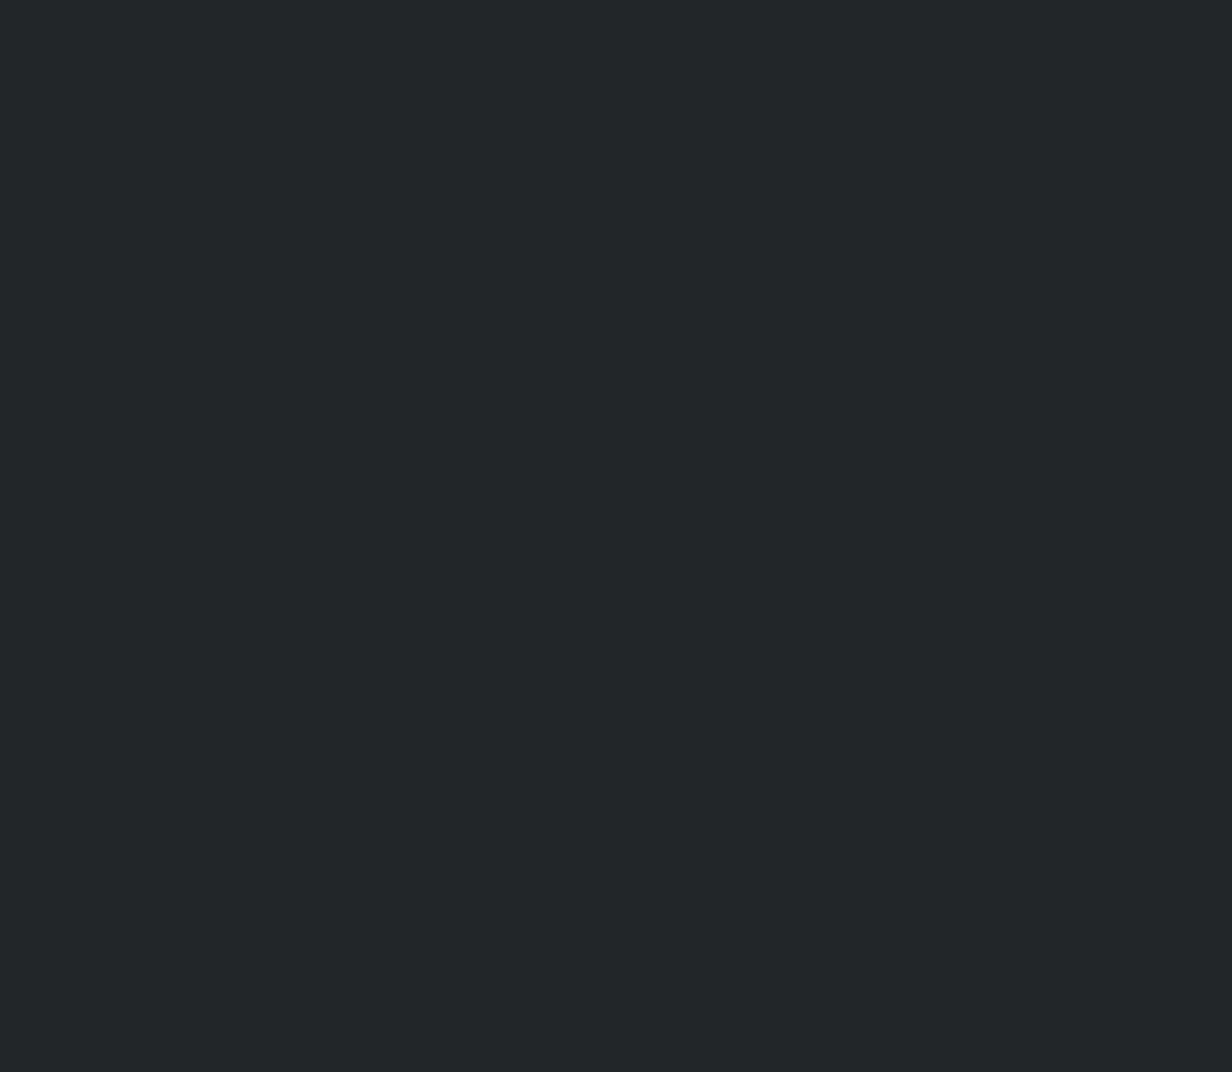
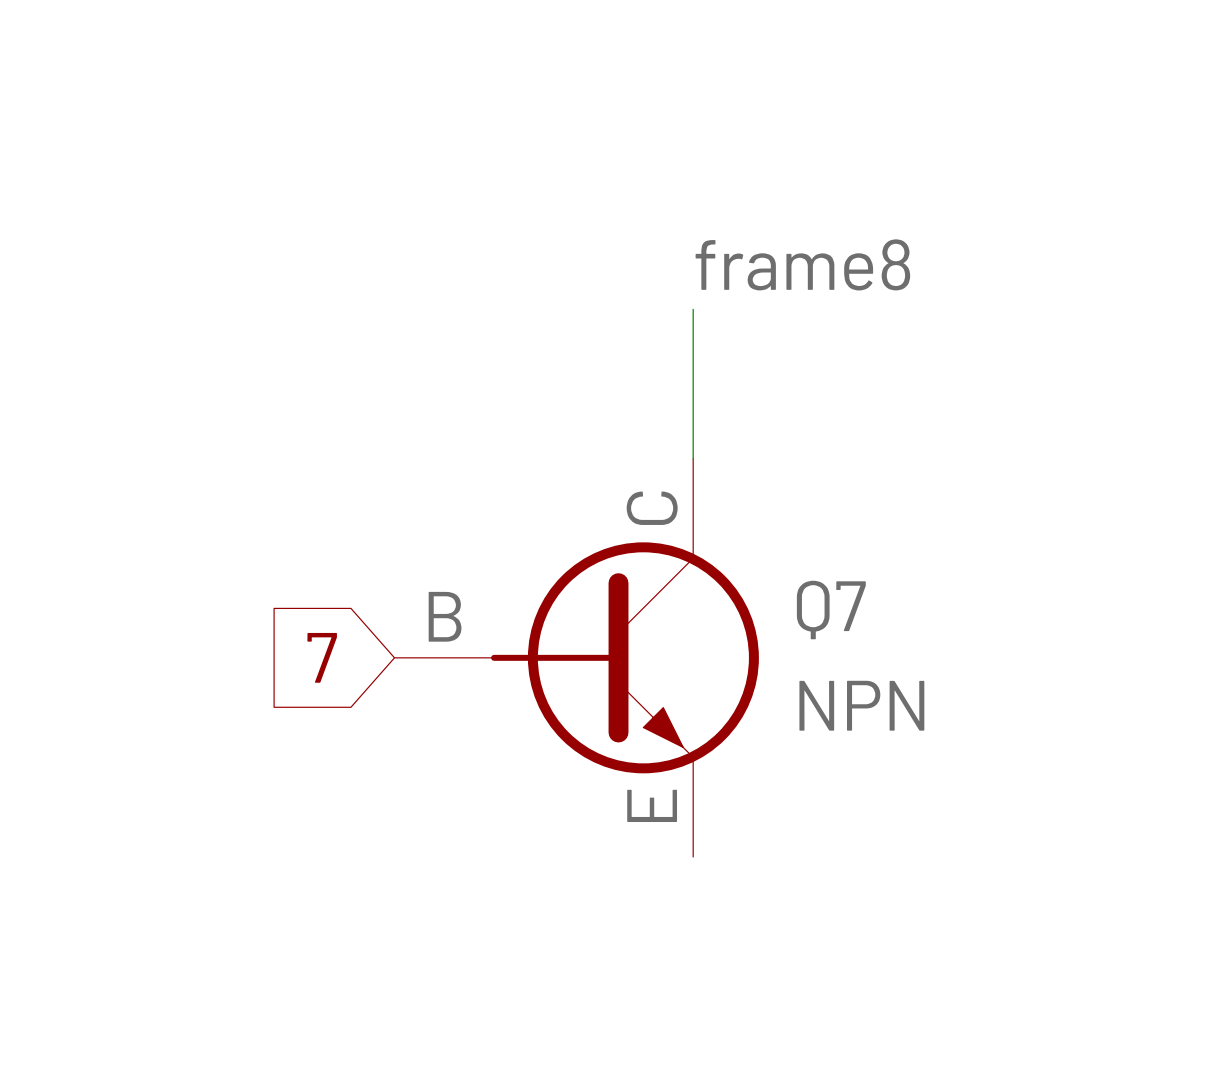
label: none -> frame8 (802, 264)
wire: none -> (693, 309) (693, 458)
global label: none -> 7 (322, 657)
Q7: none -> NPN (576, 657)

